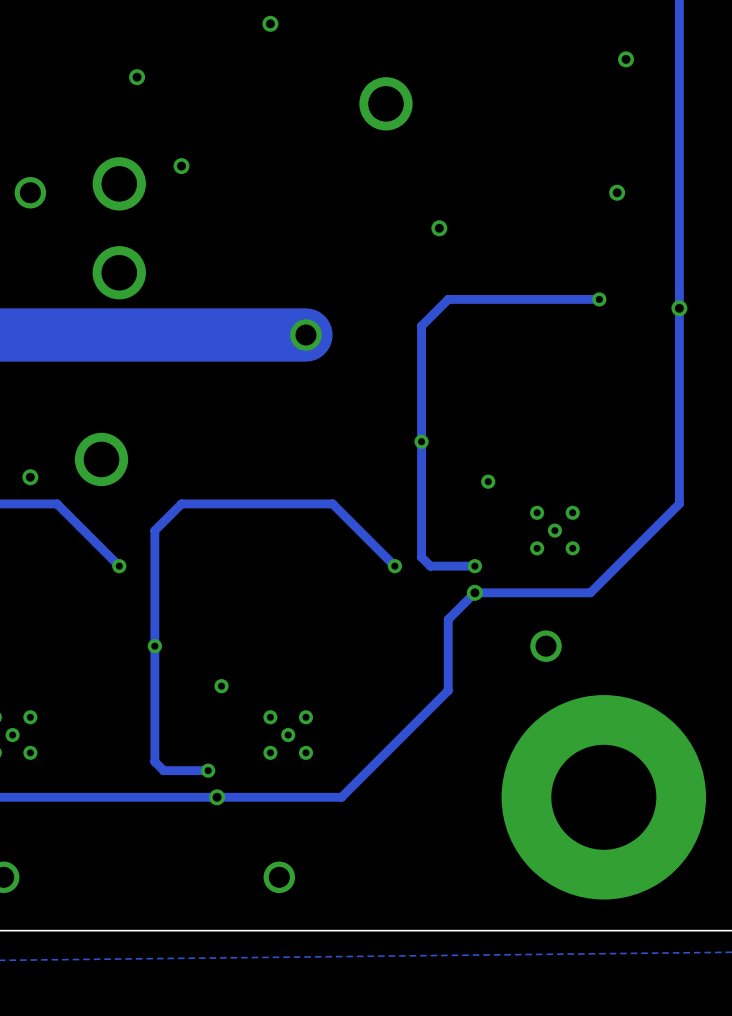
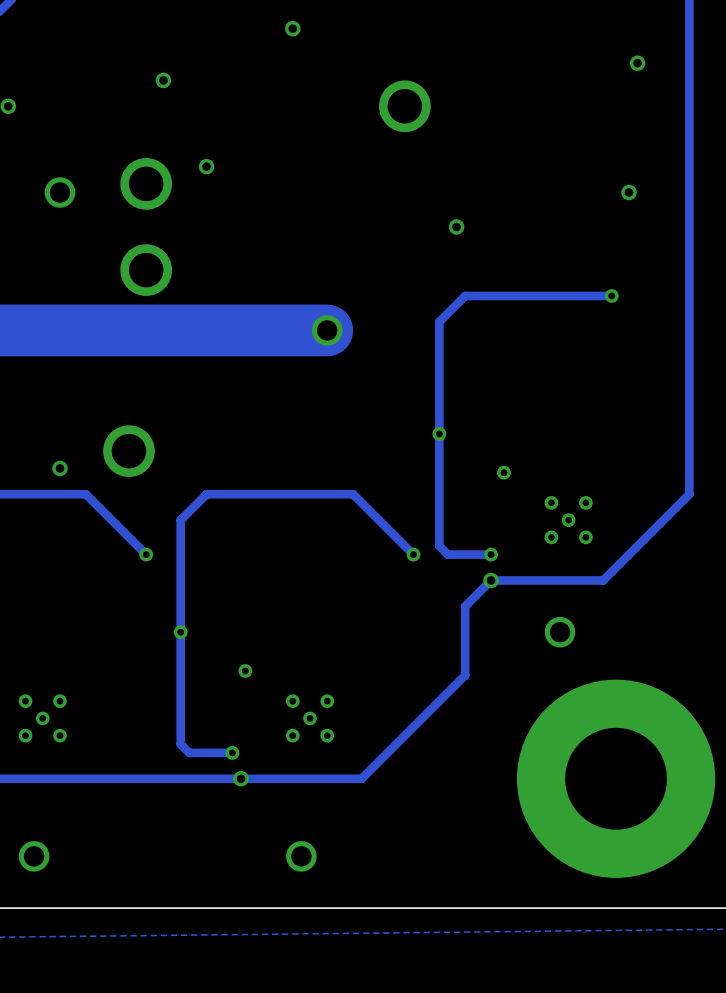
via: (679, 308) -> none

